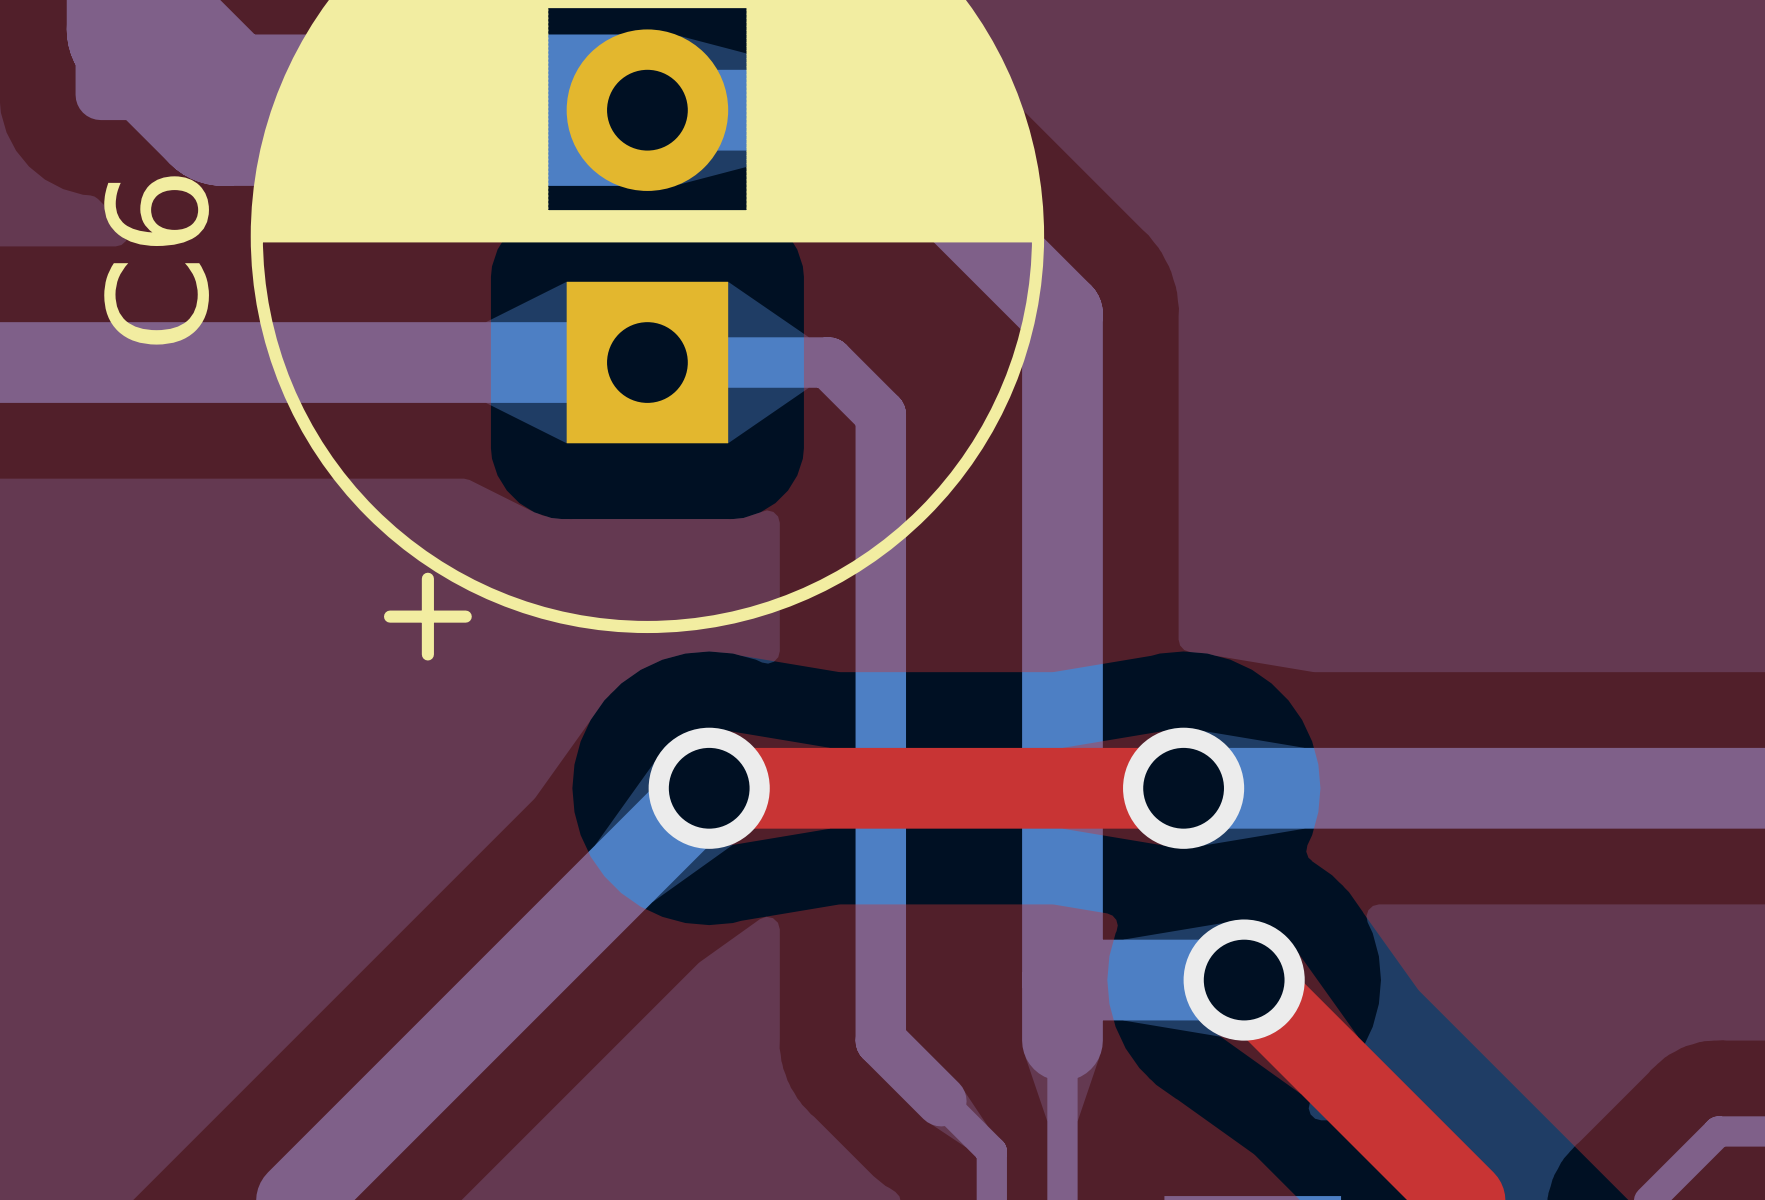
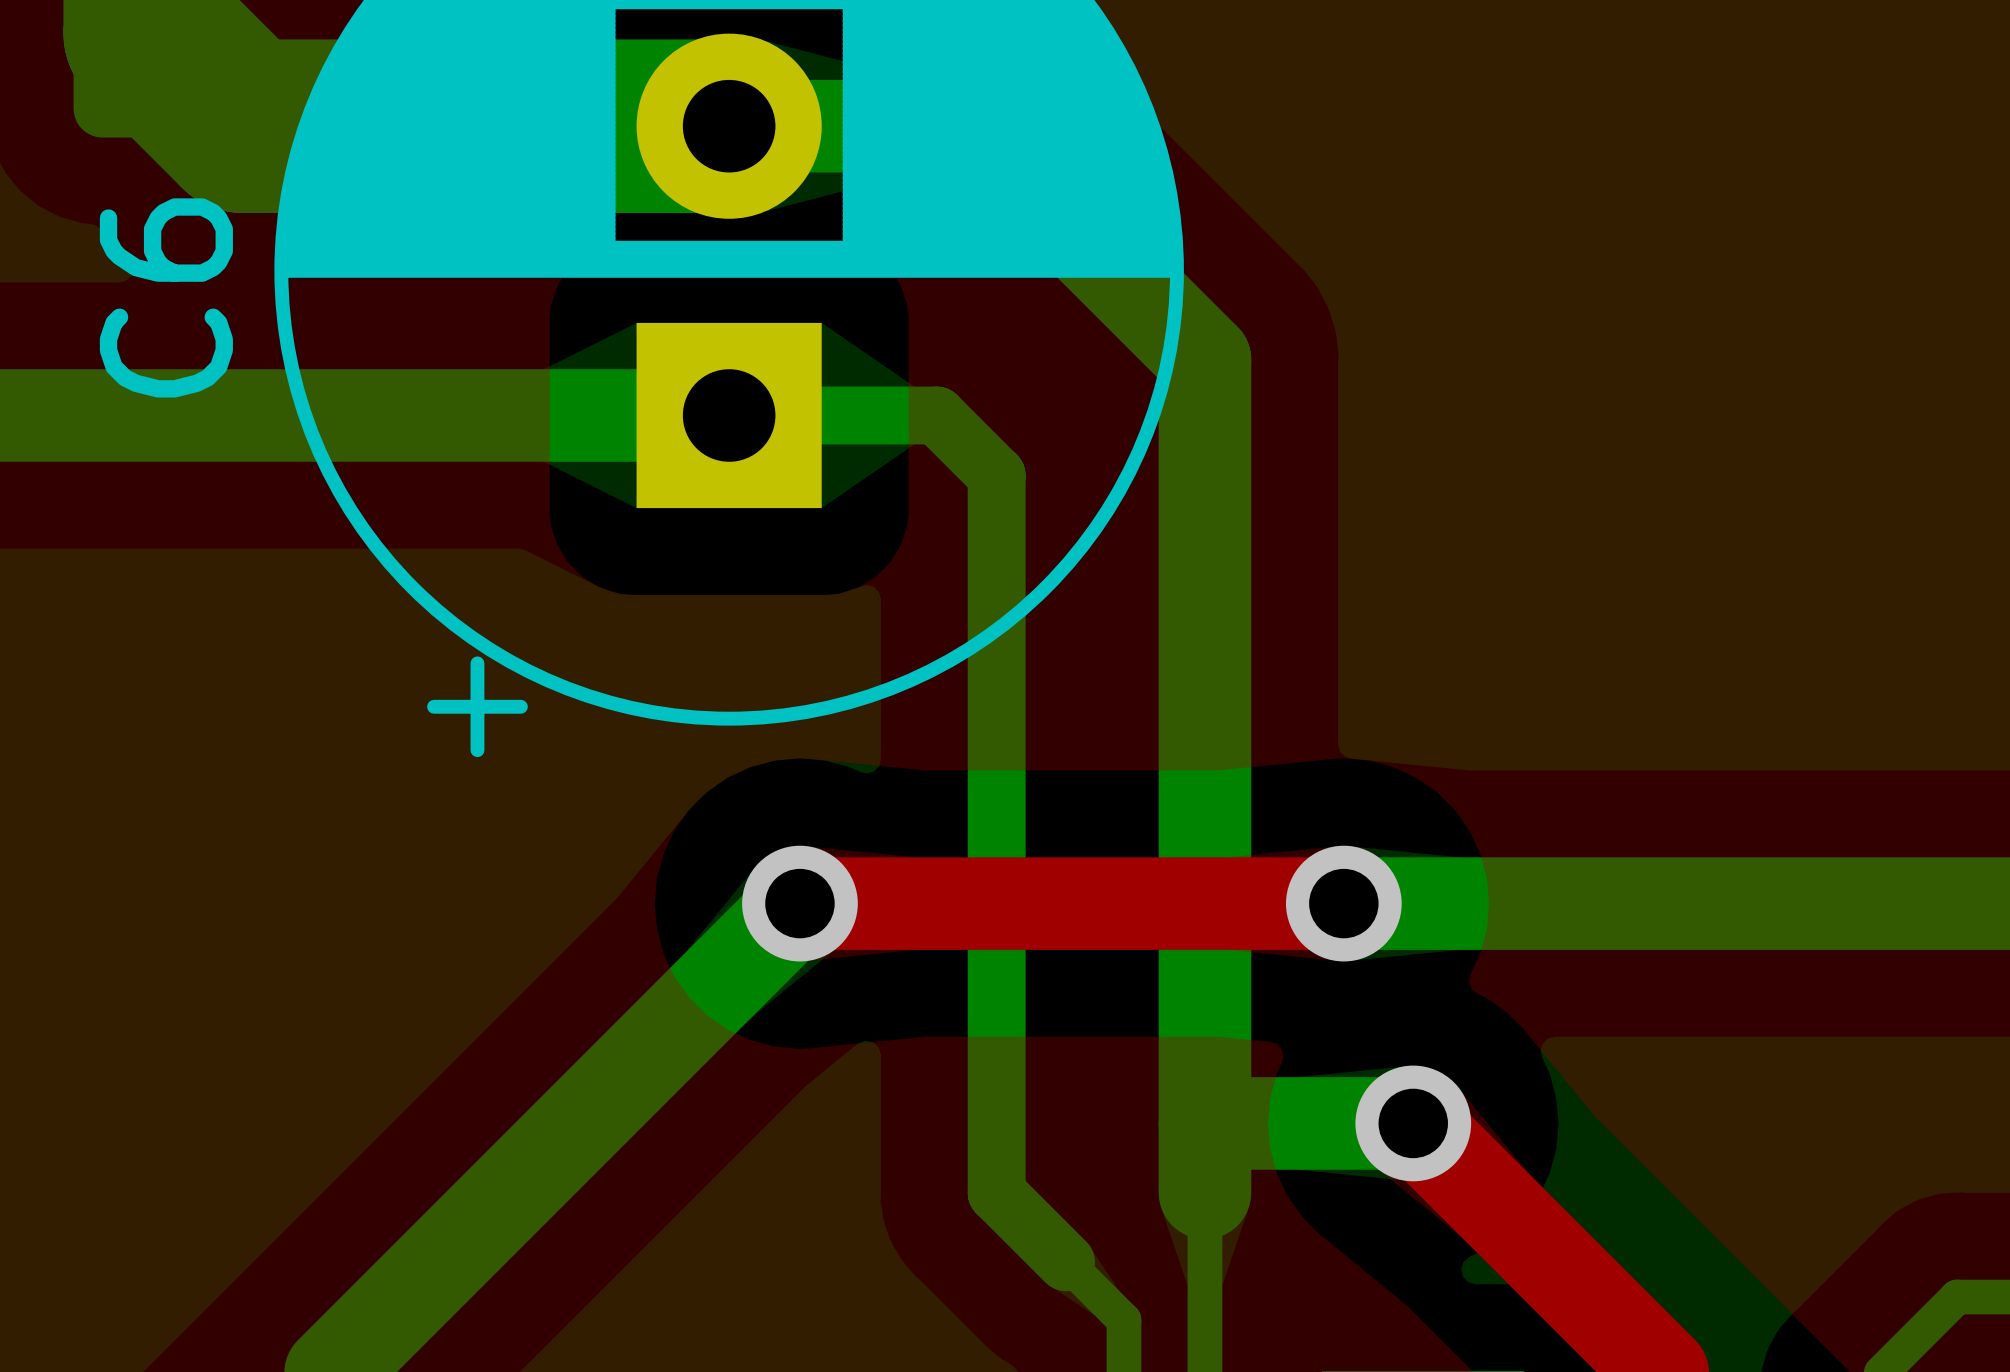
via size: [648, 727, 770, 849] -> [742, 845, 858, 962]
via size: [1123, 727, 1245, 849] -> [1285, 845, 1402, 962]
via size: [1183, 919, 1305, 1041] -> [1355, 1065, 1472, 1182]

